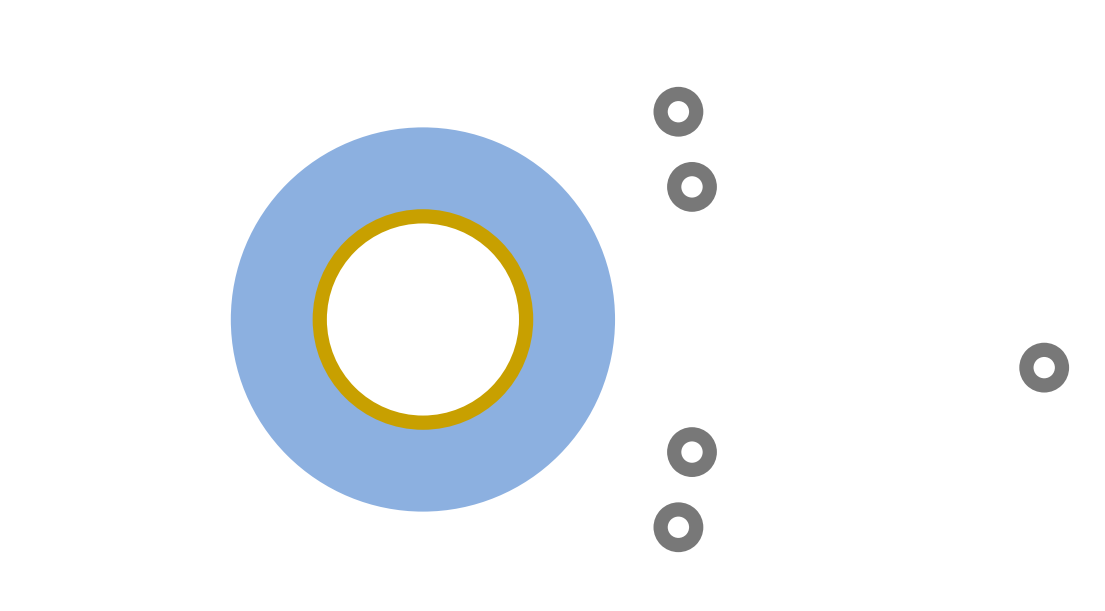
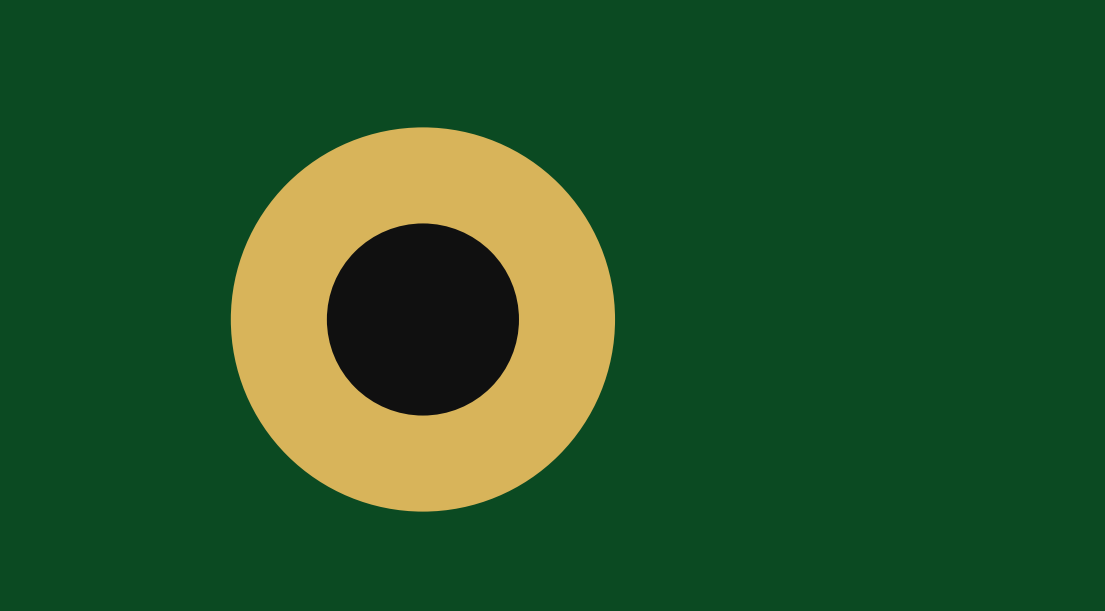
via: (678, 111) -> none
via: (691, 186) -> none
via: (1044, 367) -> none
via: (691, 452) -> none
via: (678, 527) -> none

